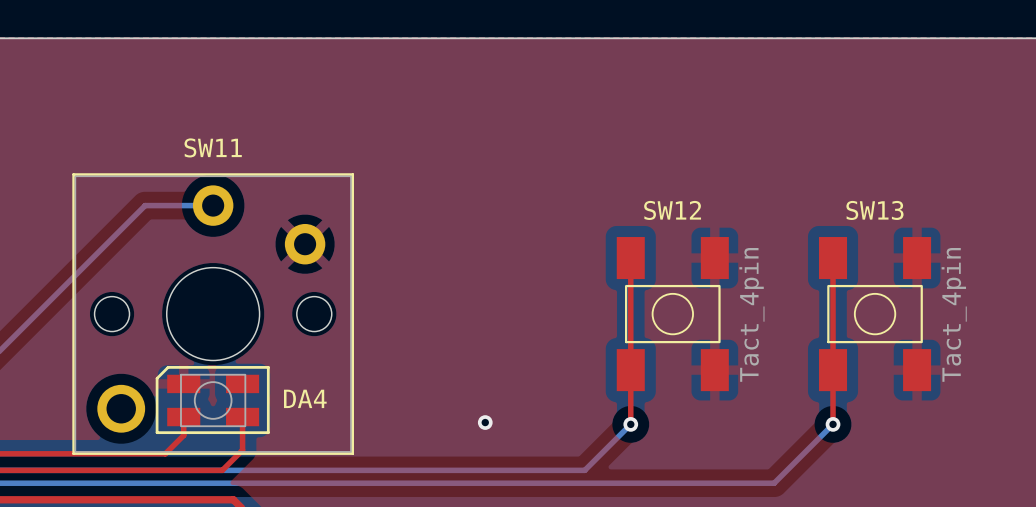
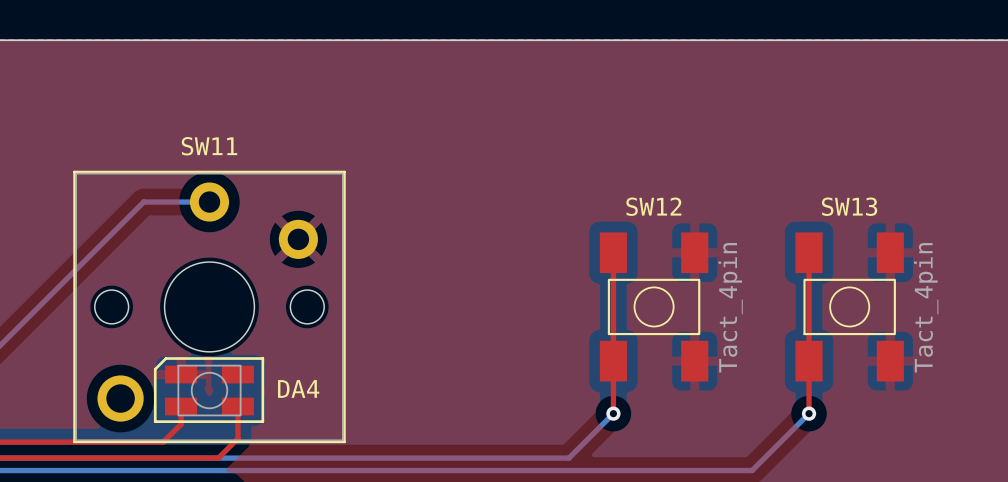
via: (485, 422) -> none

